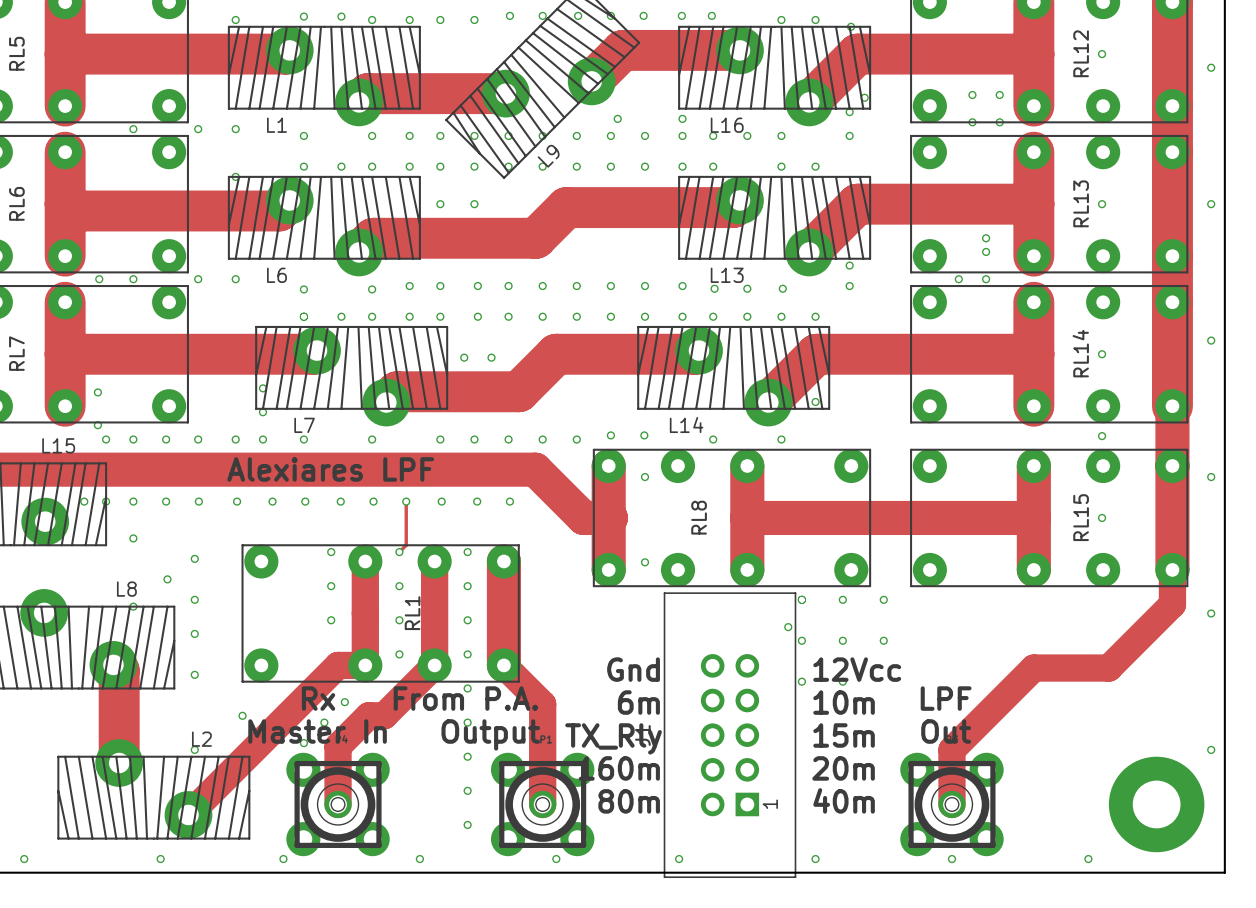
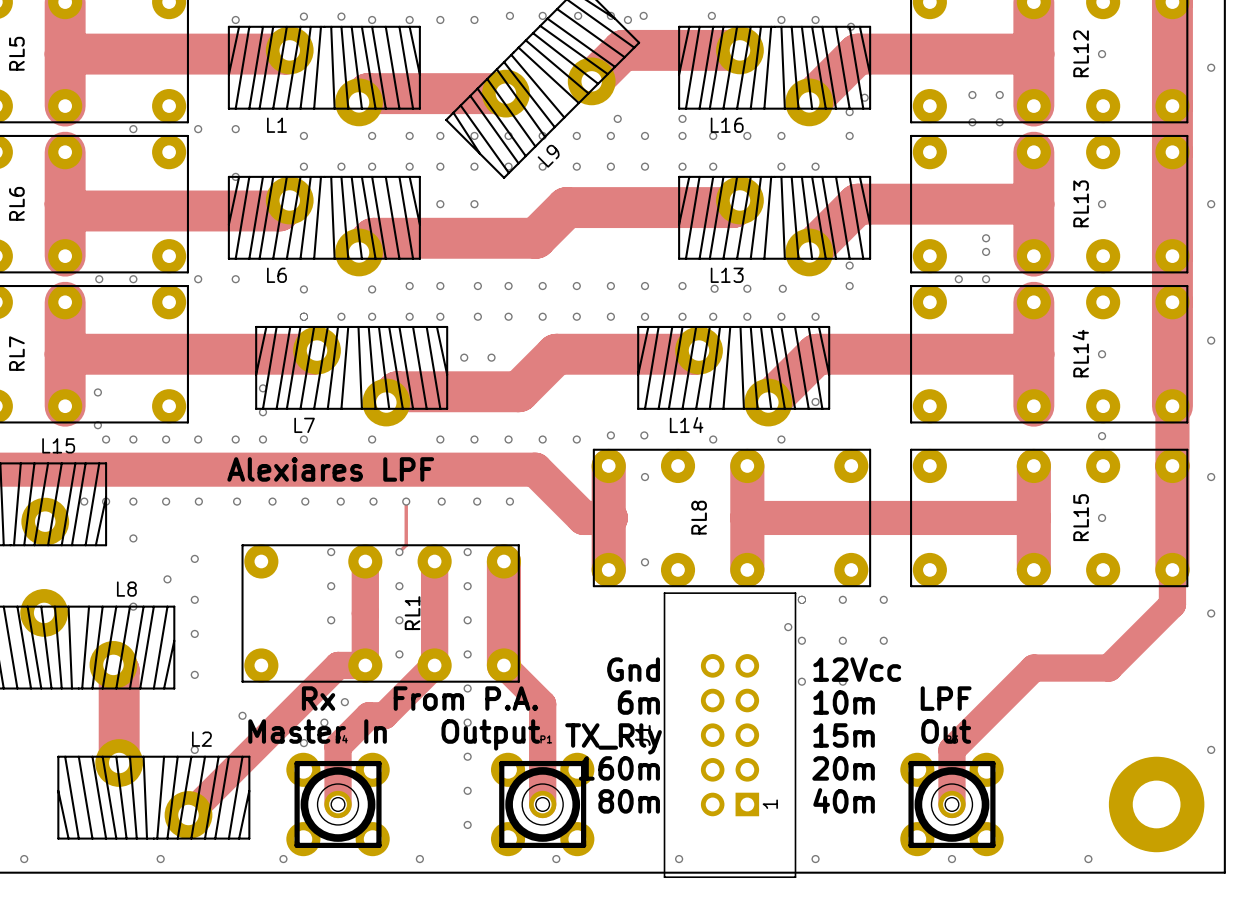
via: (681, 15) -> none
via: none -> (627, 19)

